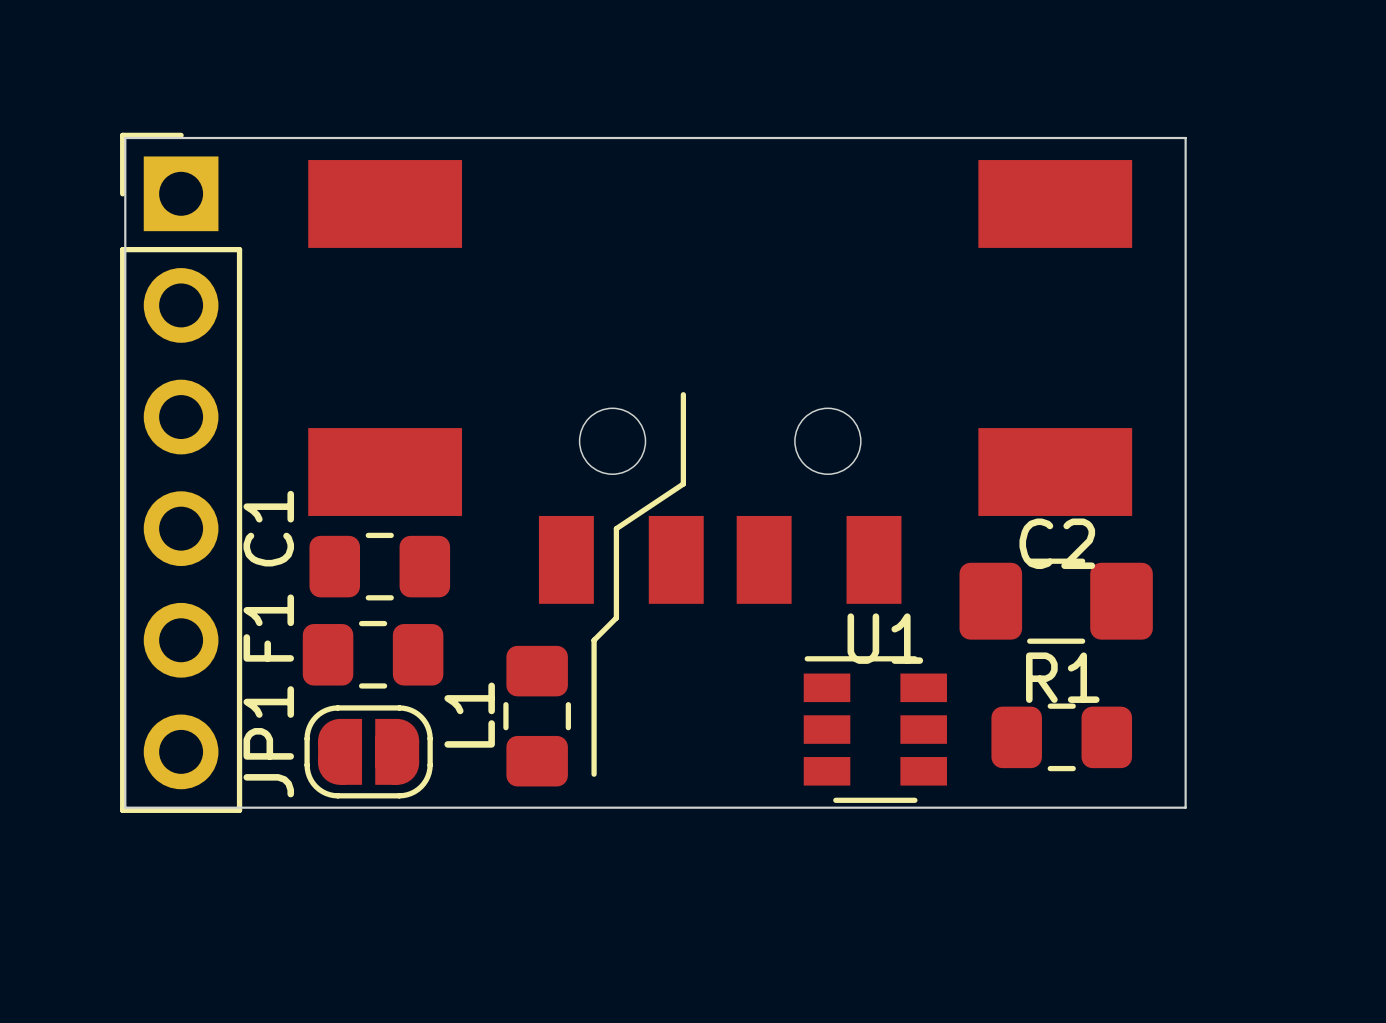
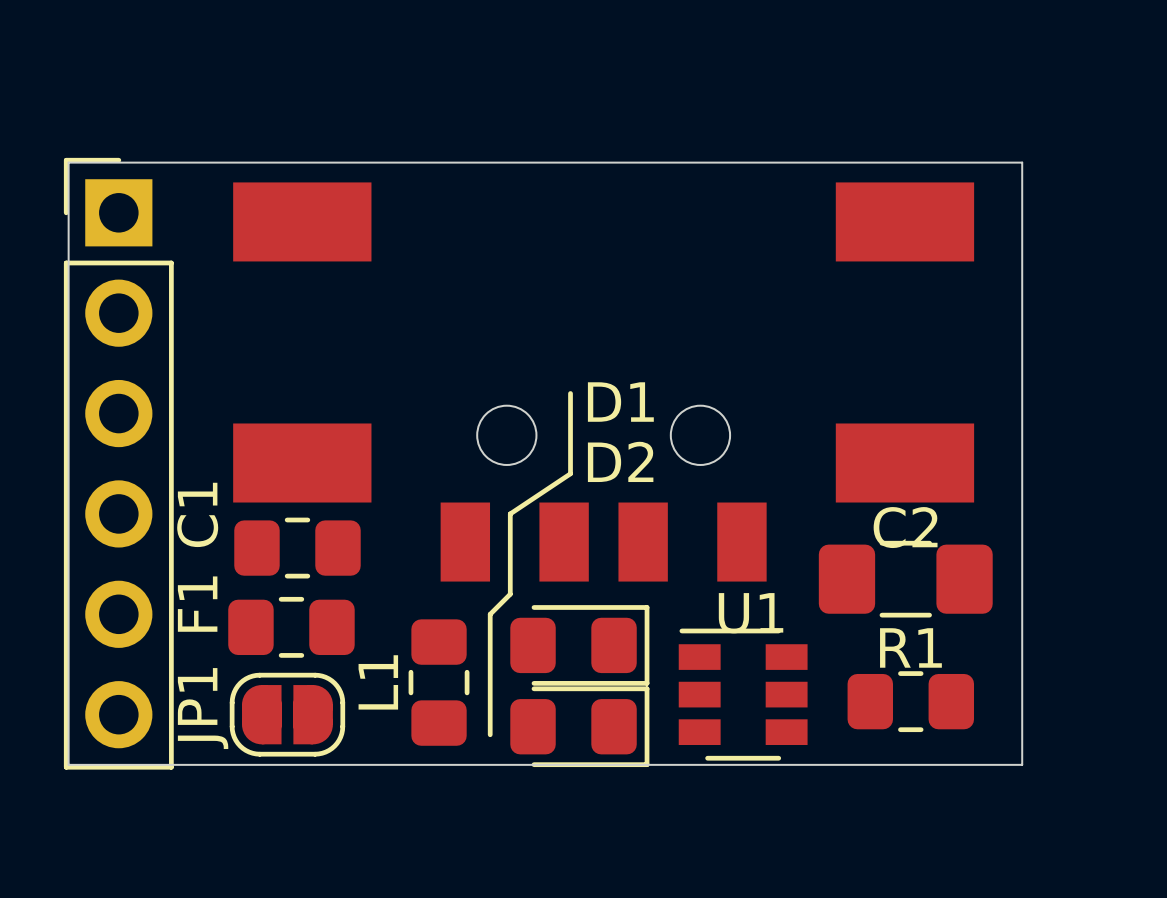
D1: none -> (579, 645)
D2: none -> (579, 726)

